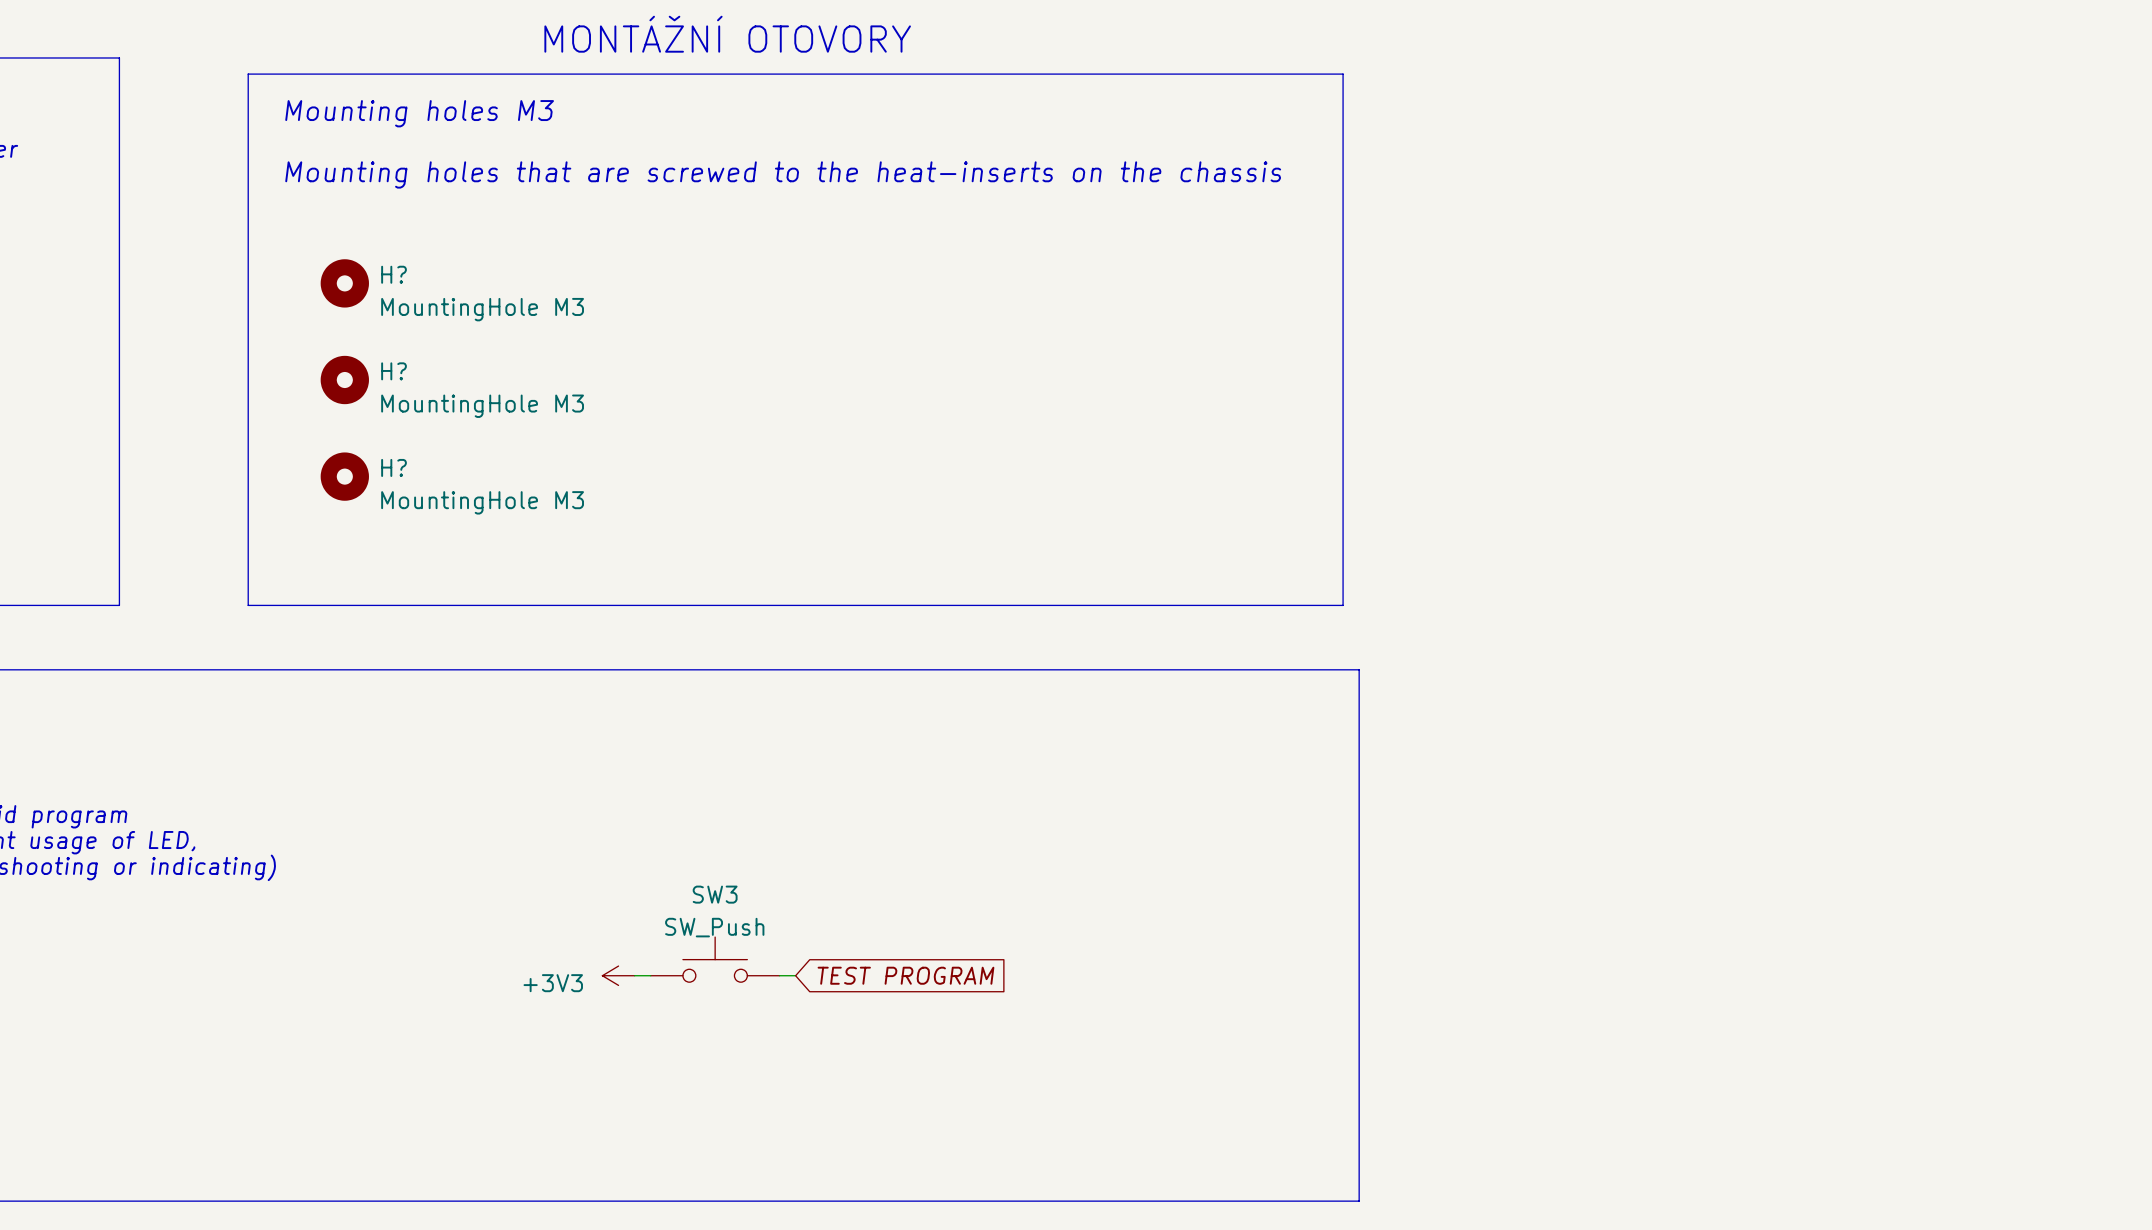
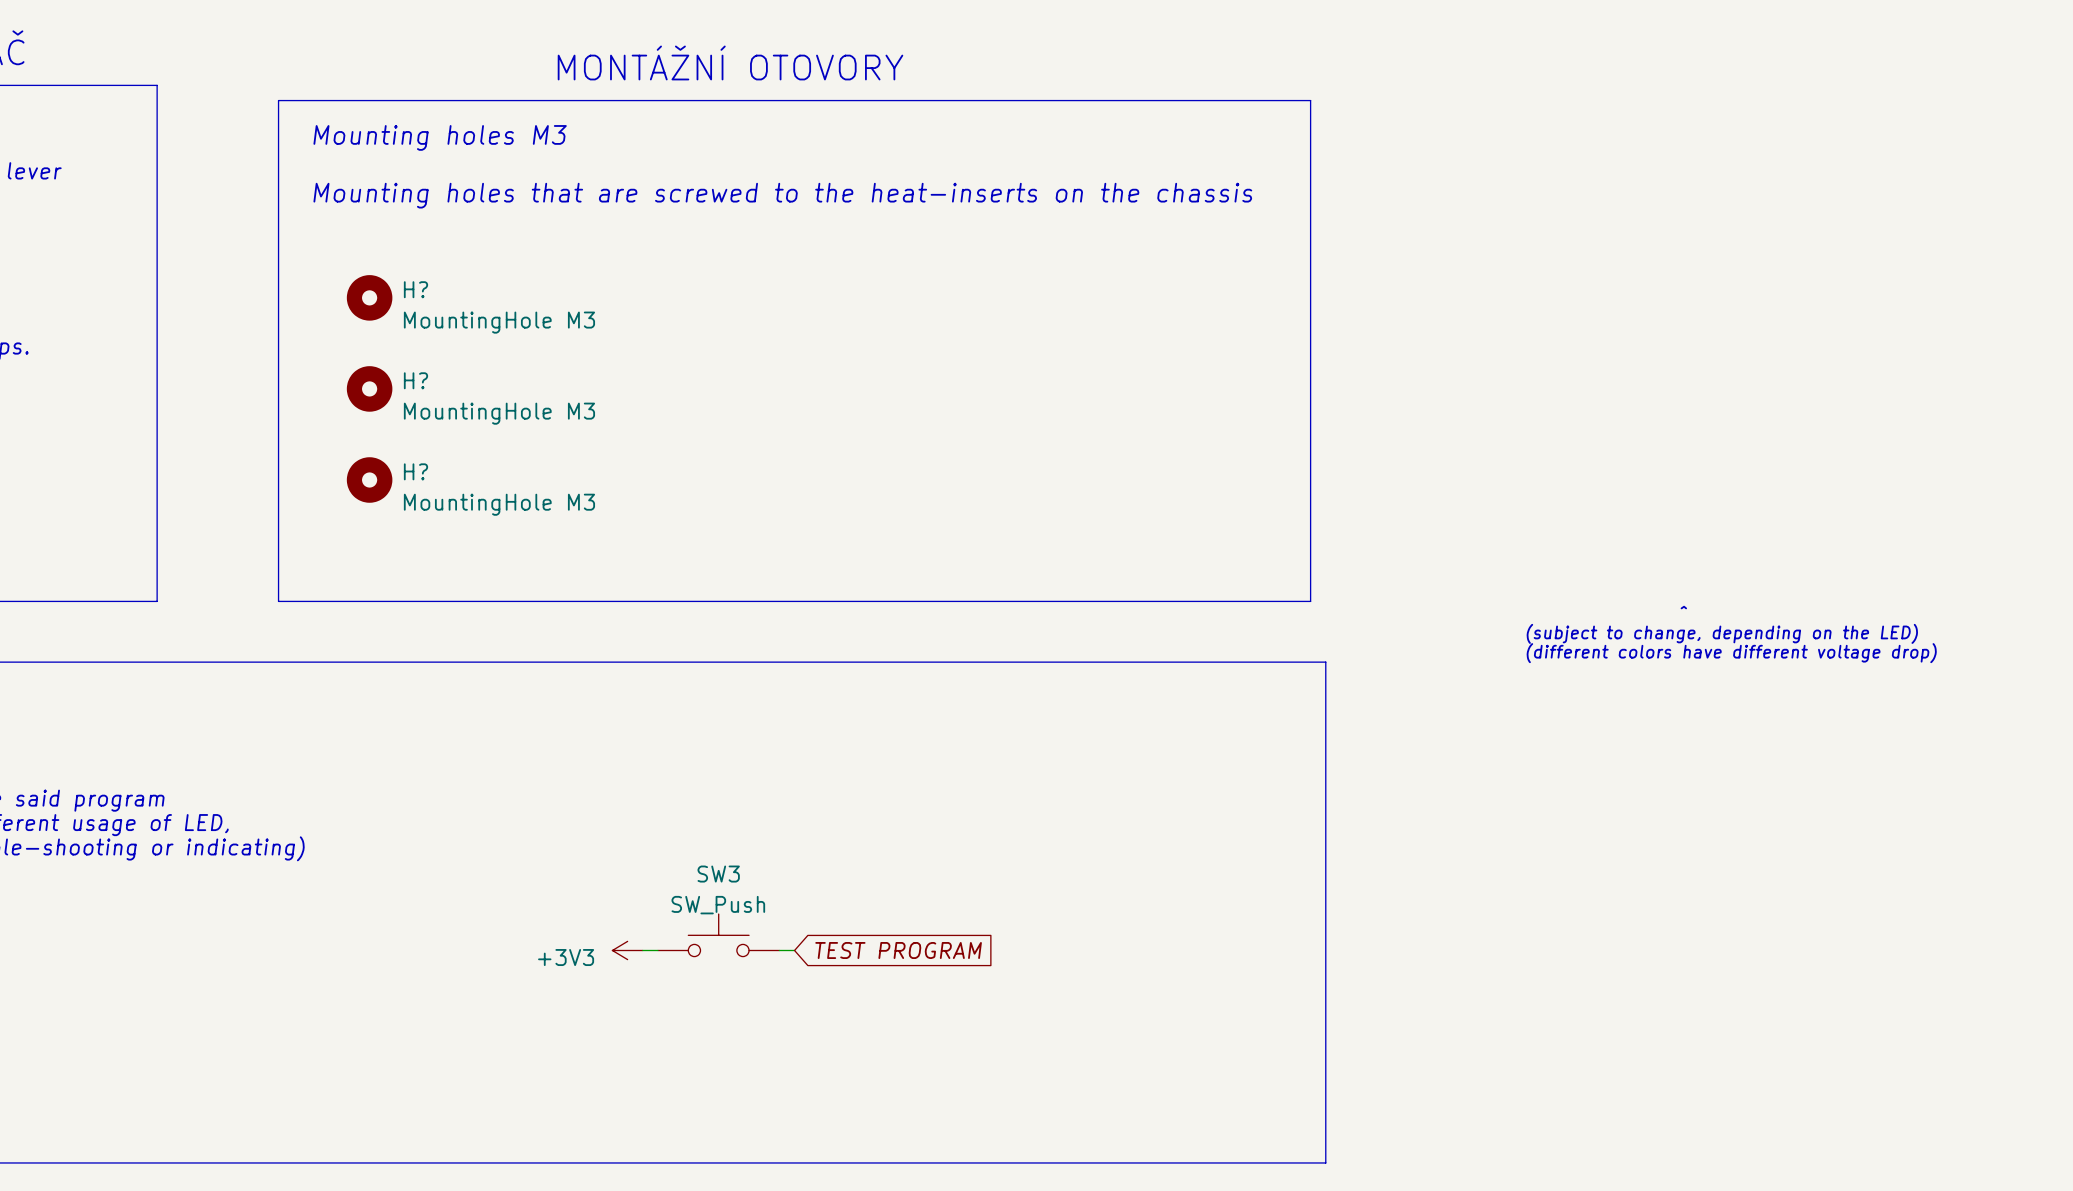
text: none -> ^ (1683, 607)
text: none -> (subject to change, depending on the LED) (1722, 633)
text: none -> (different colors have different voltage drop) (1731, 653)

